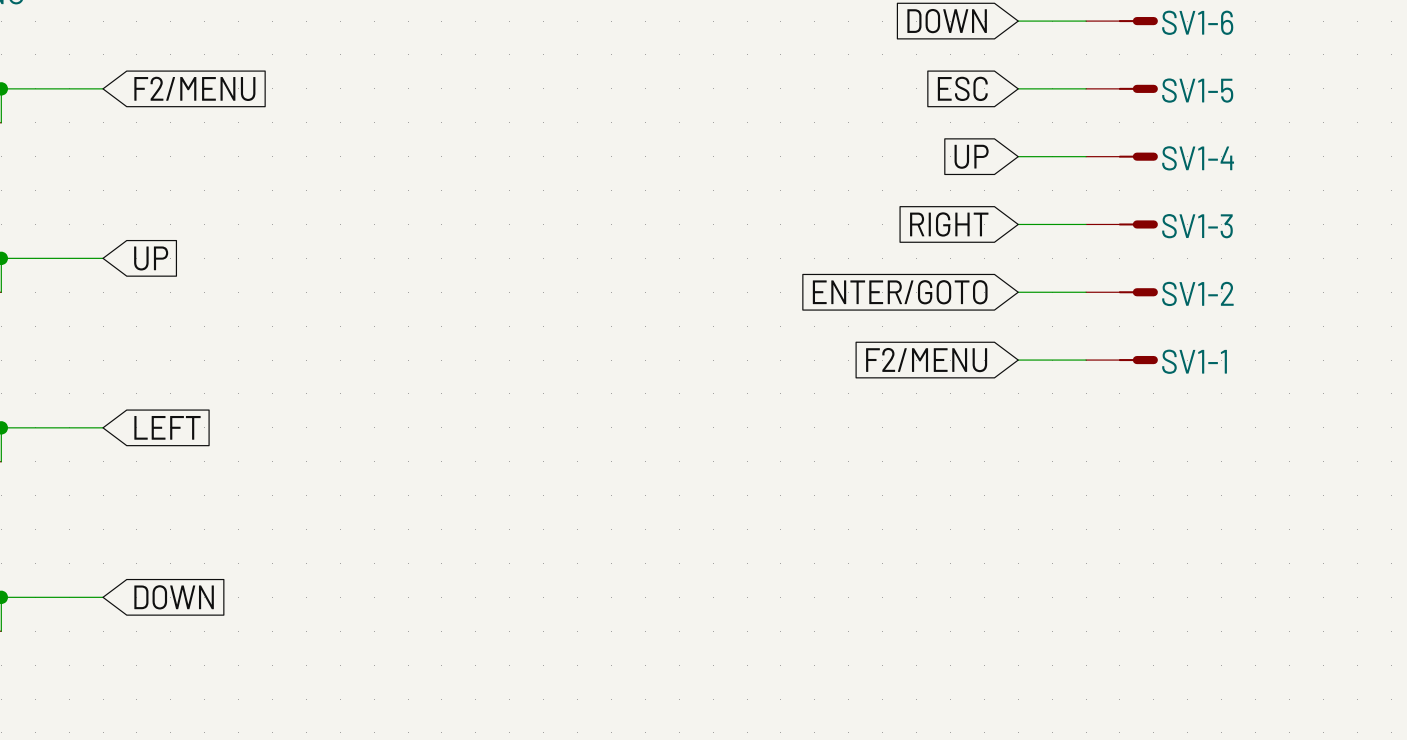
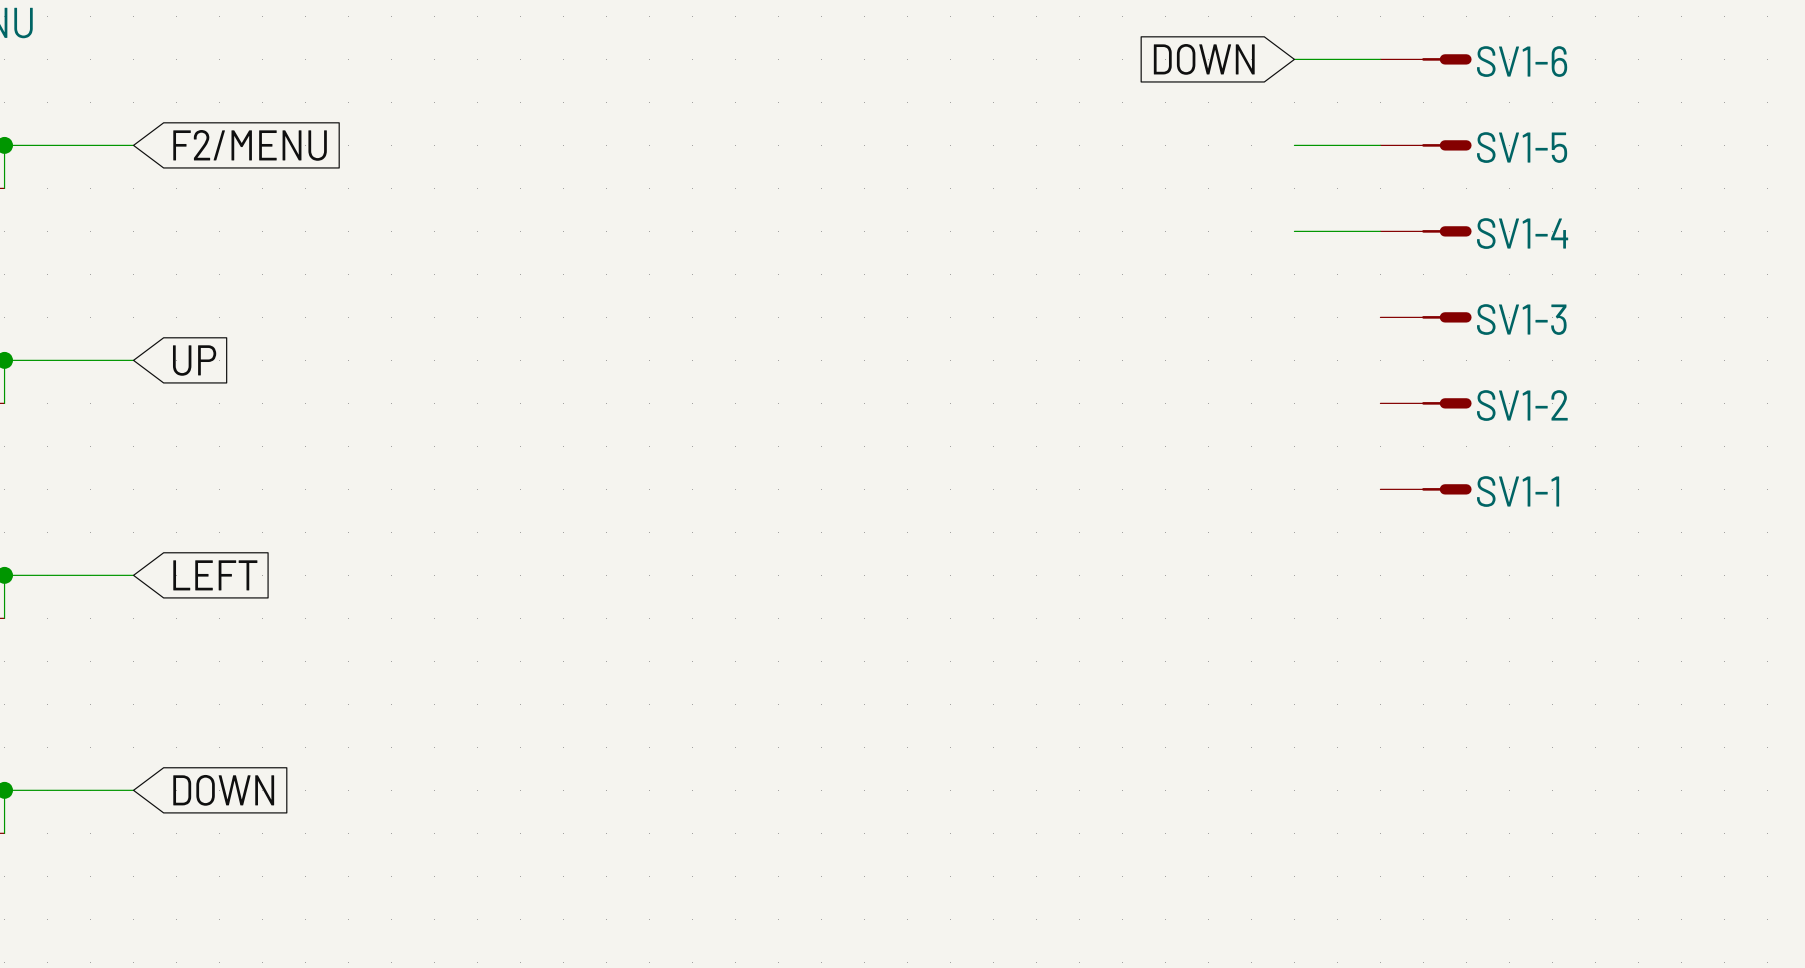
global label: ESC (962, 88) -> none
global label: UP (971, 156) -> none
global label: RIGHT (949, 224) -> none
wire: (1018, 224) (1086, 224) -> none
global label: ENTER/GOTO (900, 292) -> none
wire: (1018, 292) (1086, 292) -> none
global label: F2/MENU (926, 360) -> none
wire: (1018, 360) (1086, 360) -> none

